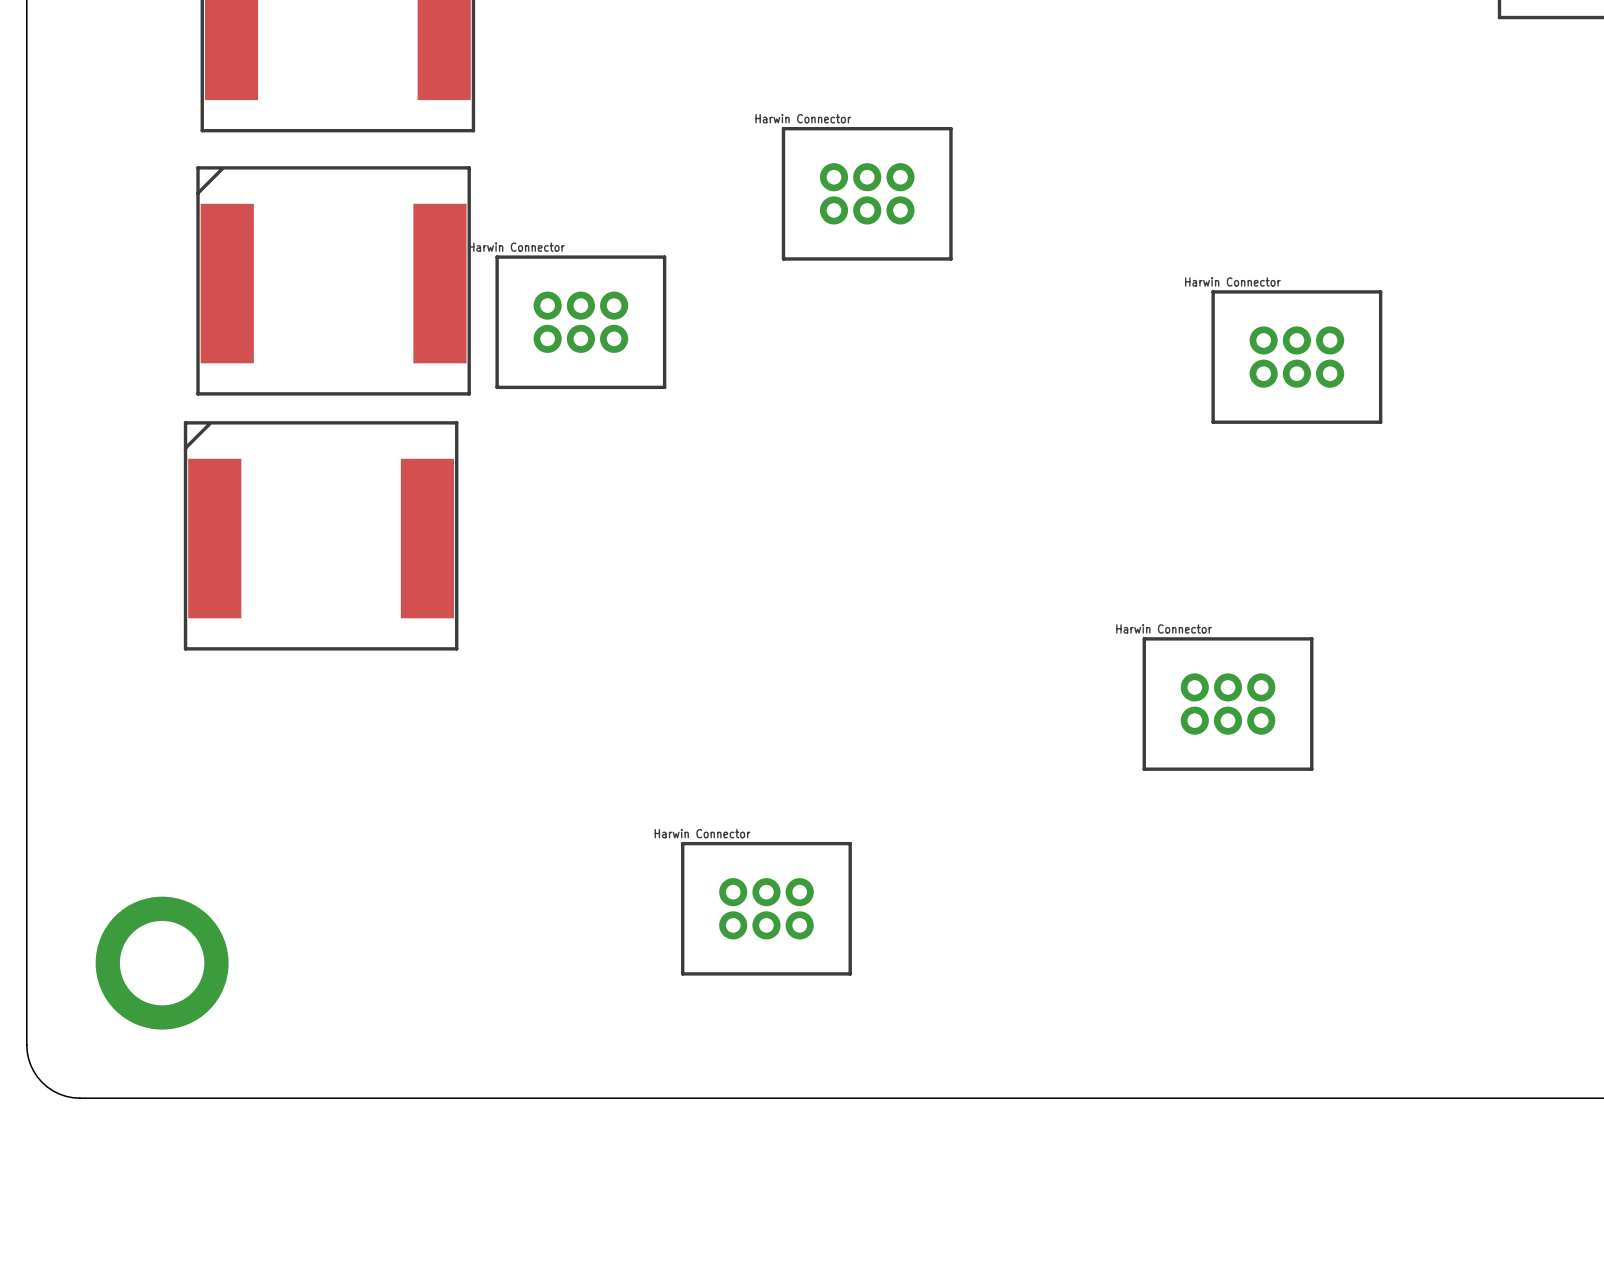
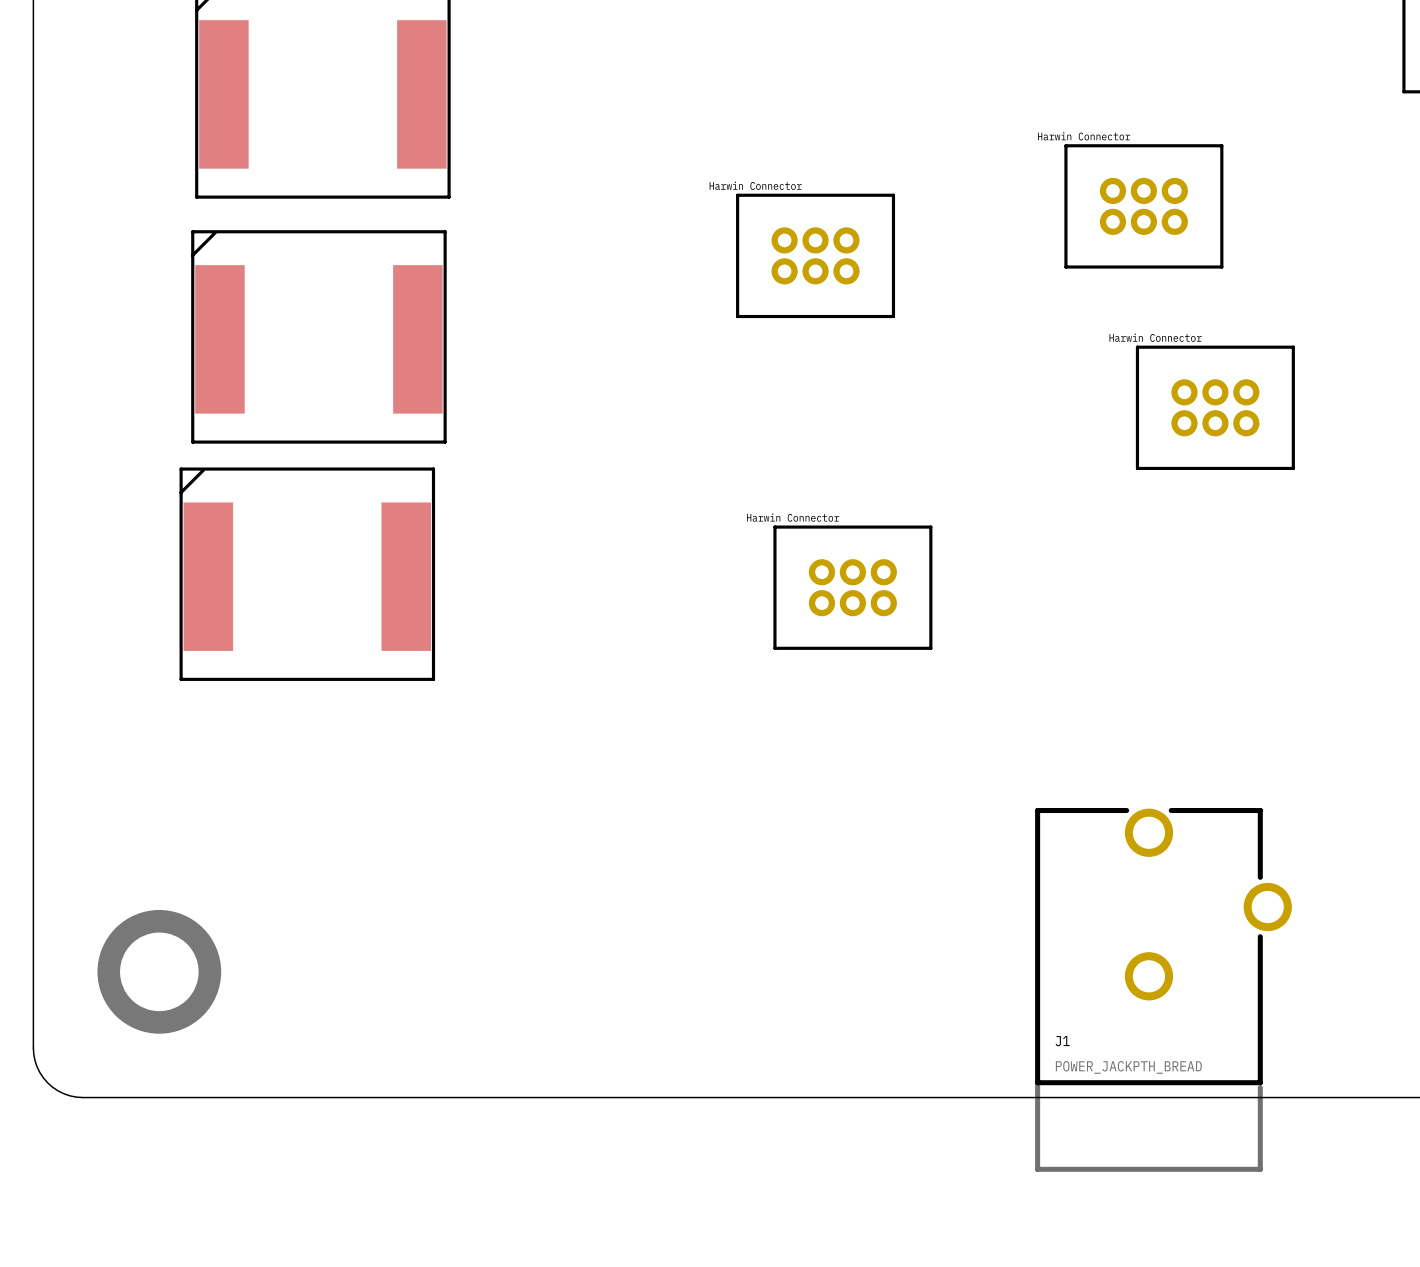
part: none -> (1143, 206)
part: (580, 322) -> none
part: none -> (852, 587)
part: (1228, 704) -> none
part: (766, 908) -> none
J1: none -> POWER_JACKPTH_BREAD (1163, 989)

